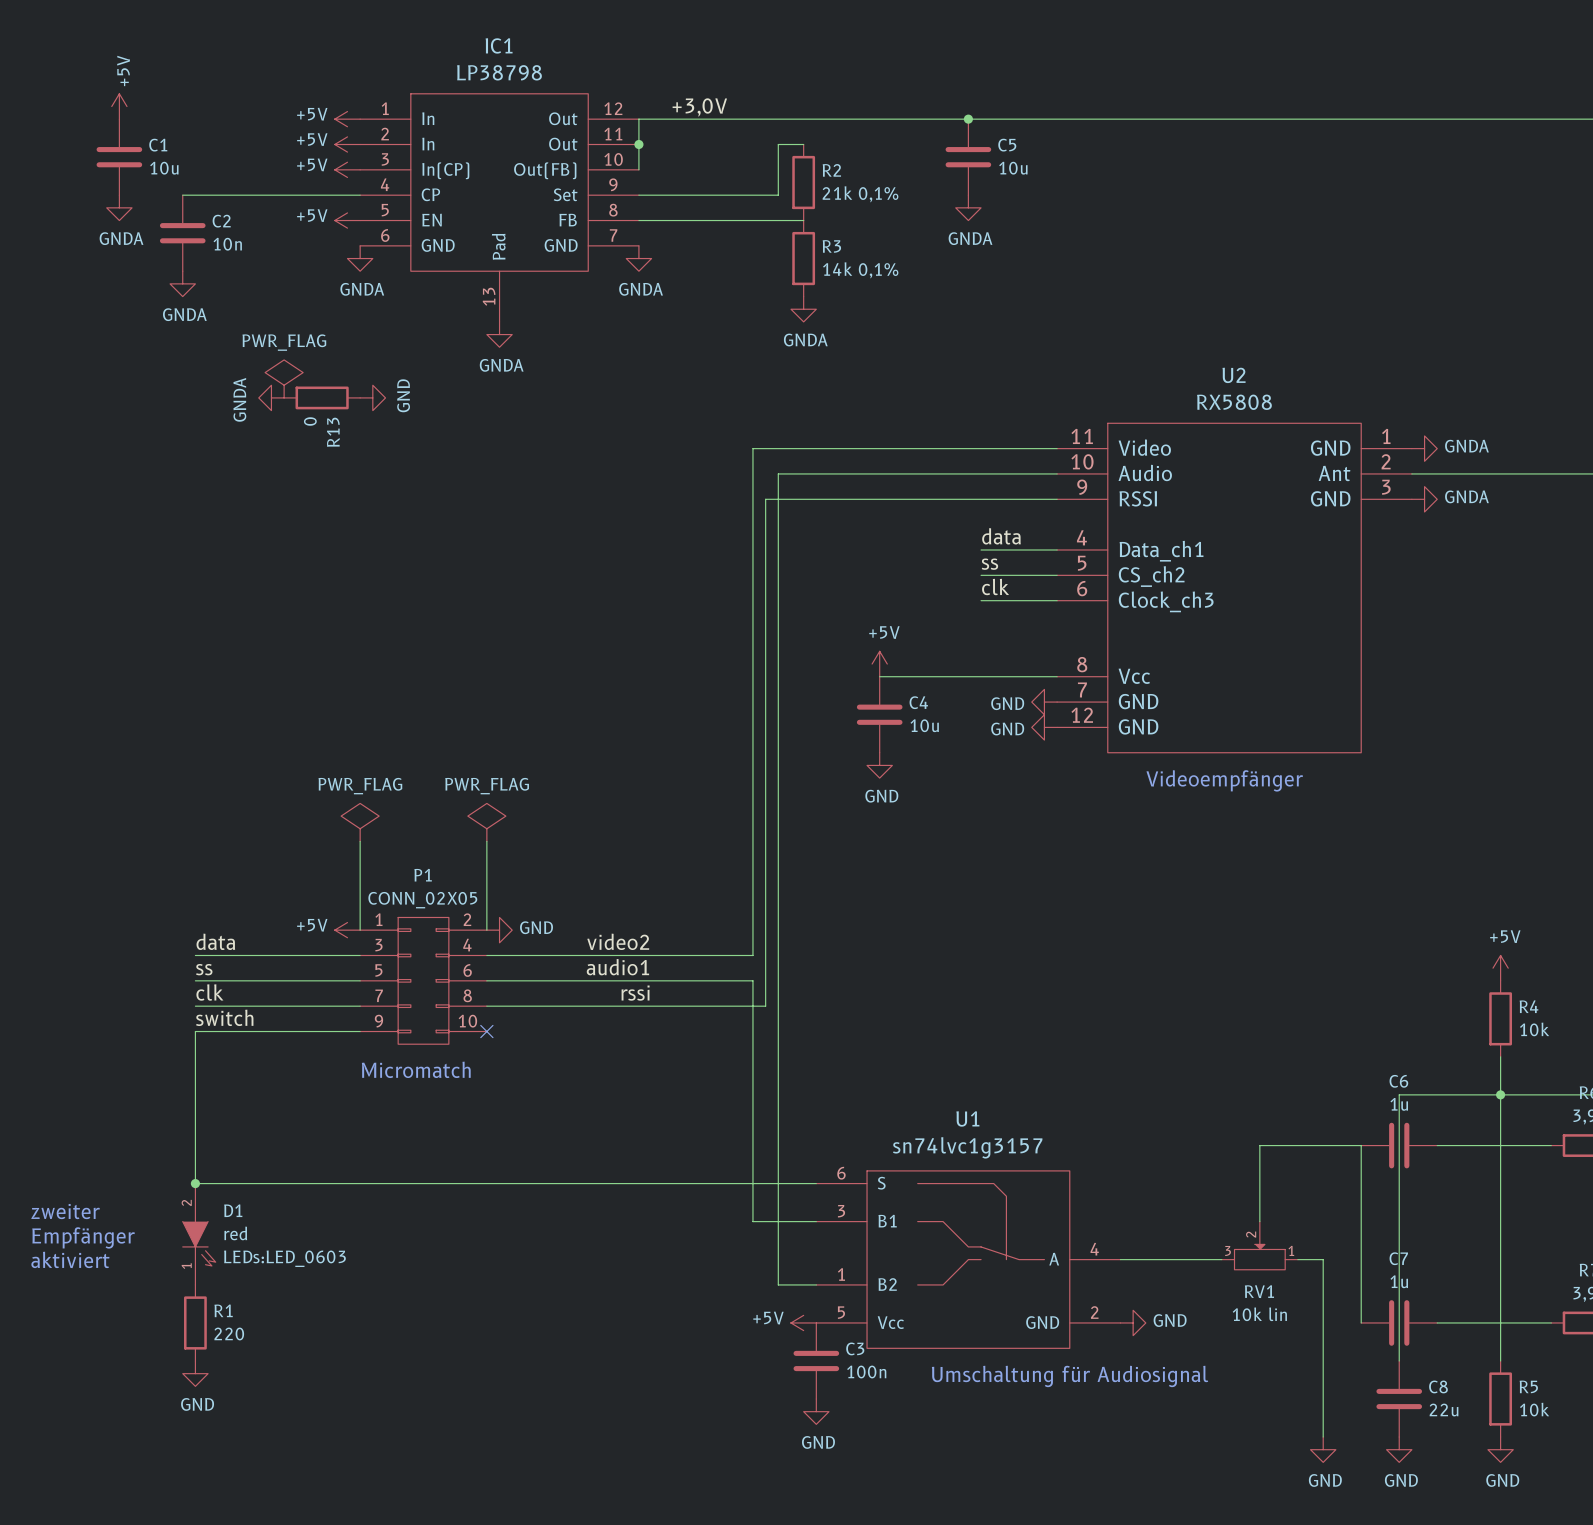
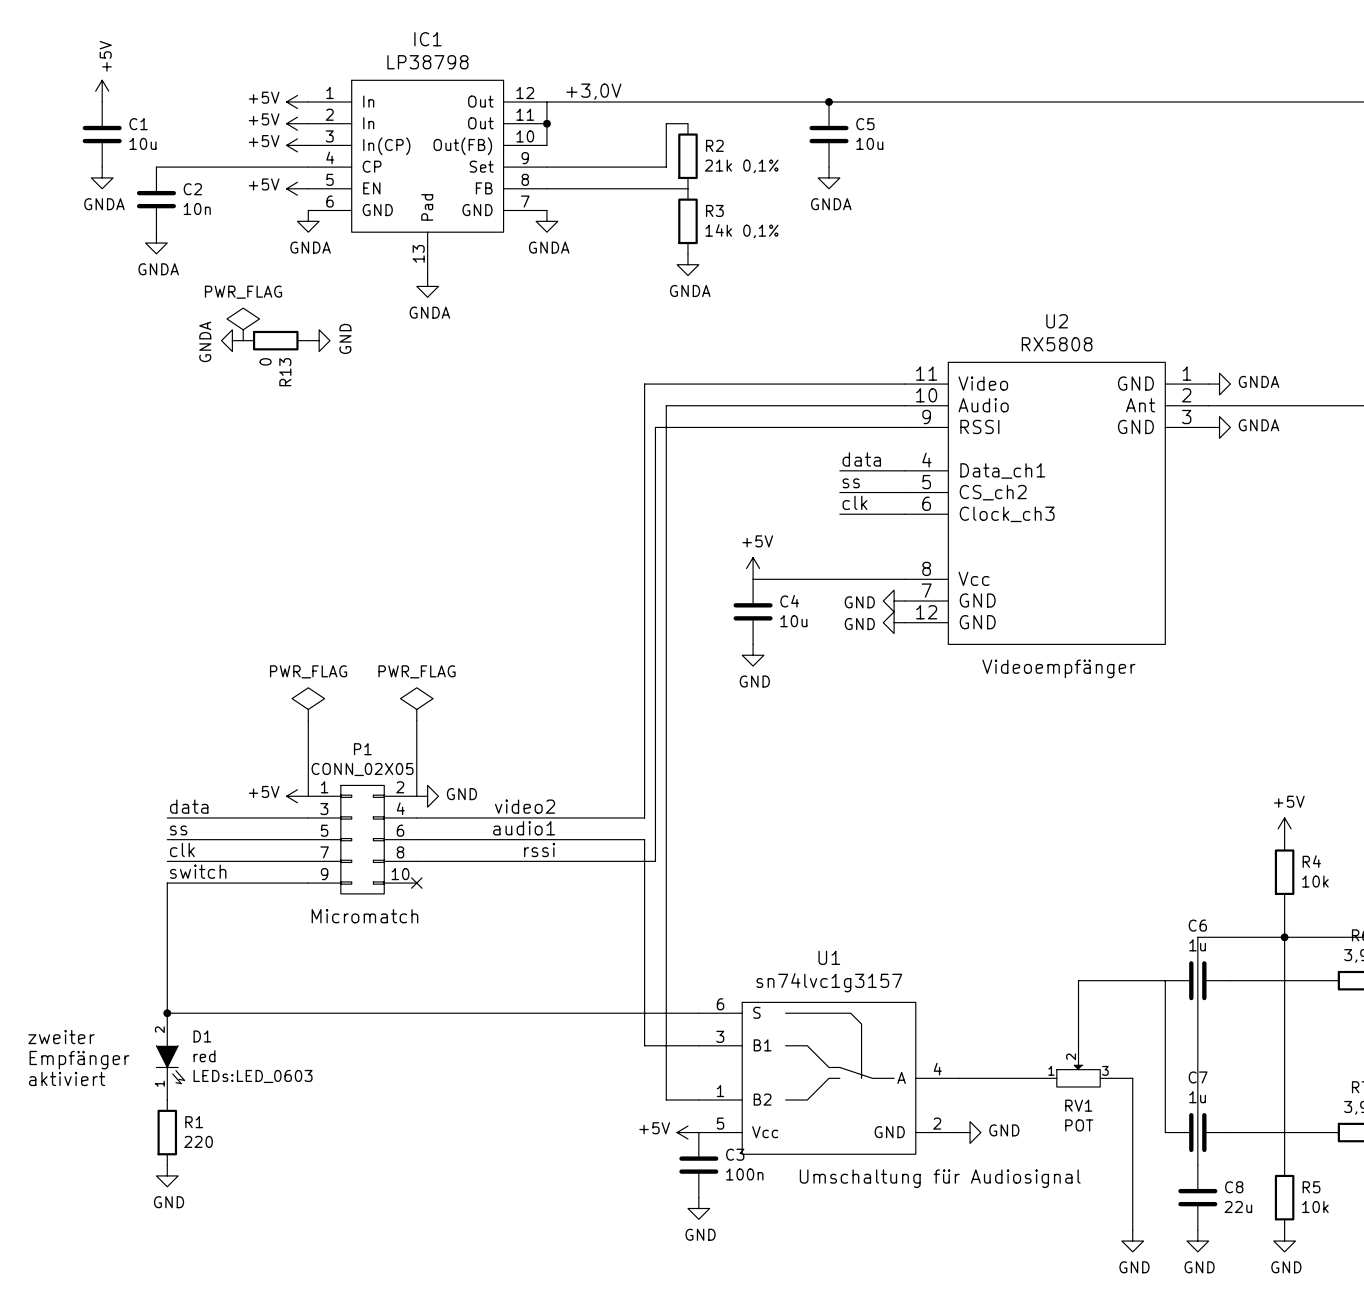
RV1 flip: as is (1259, 1257) -> left-right (1078, 1076)
RV1 value: 10k lin (1259, 1314) -> POT (1079, 1125)

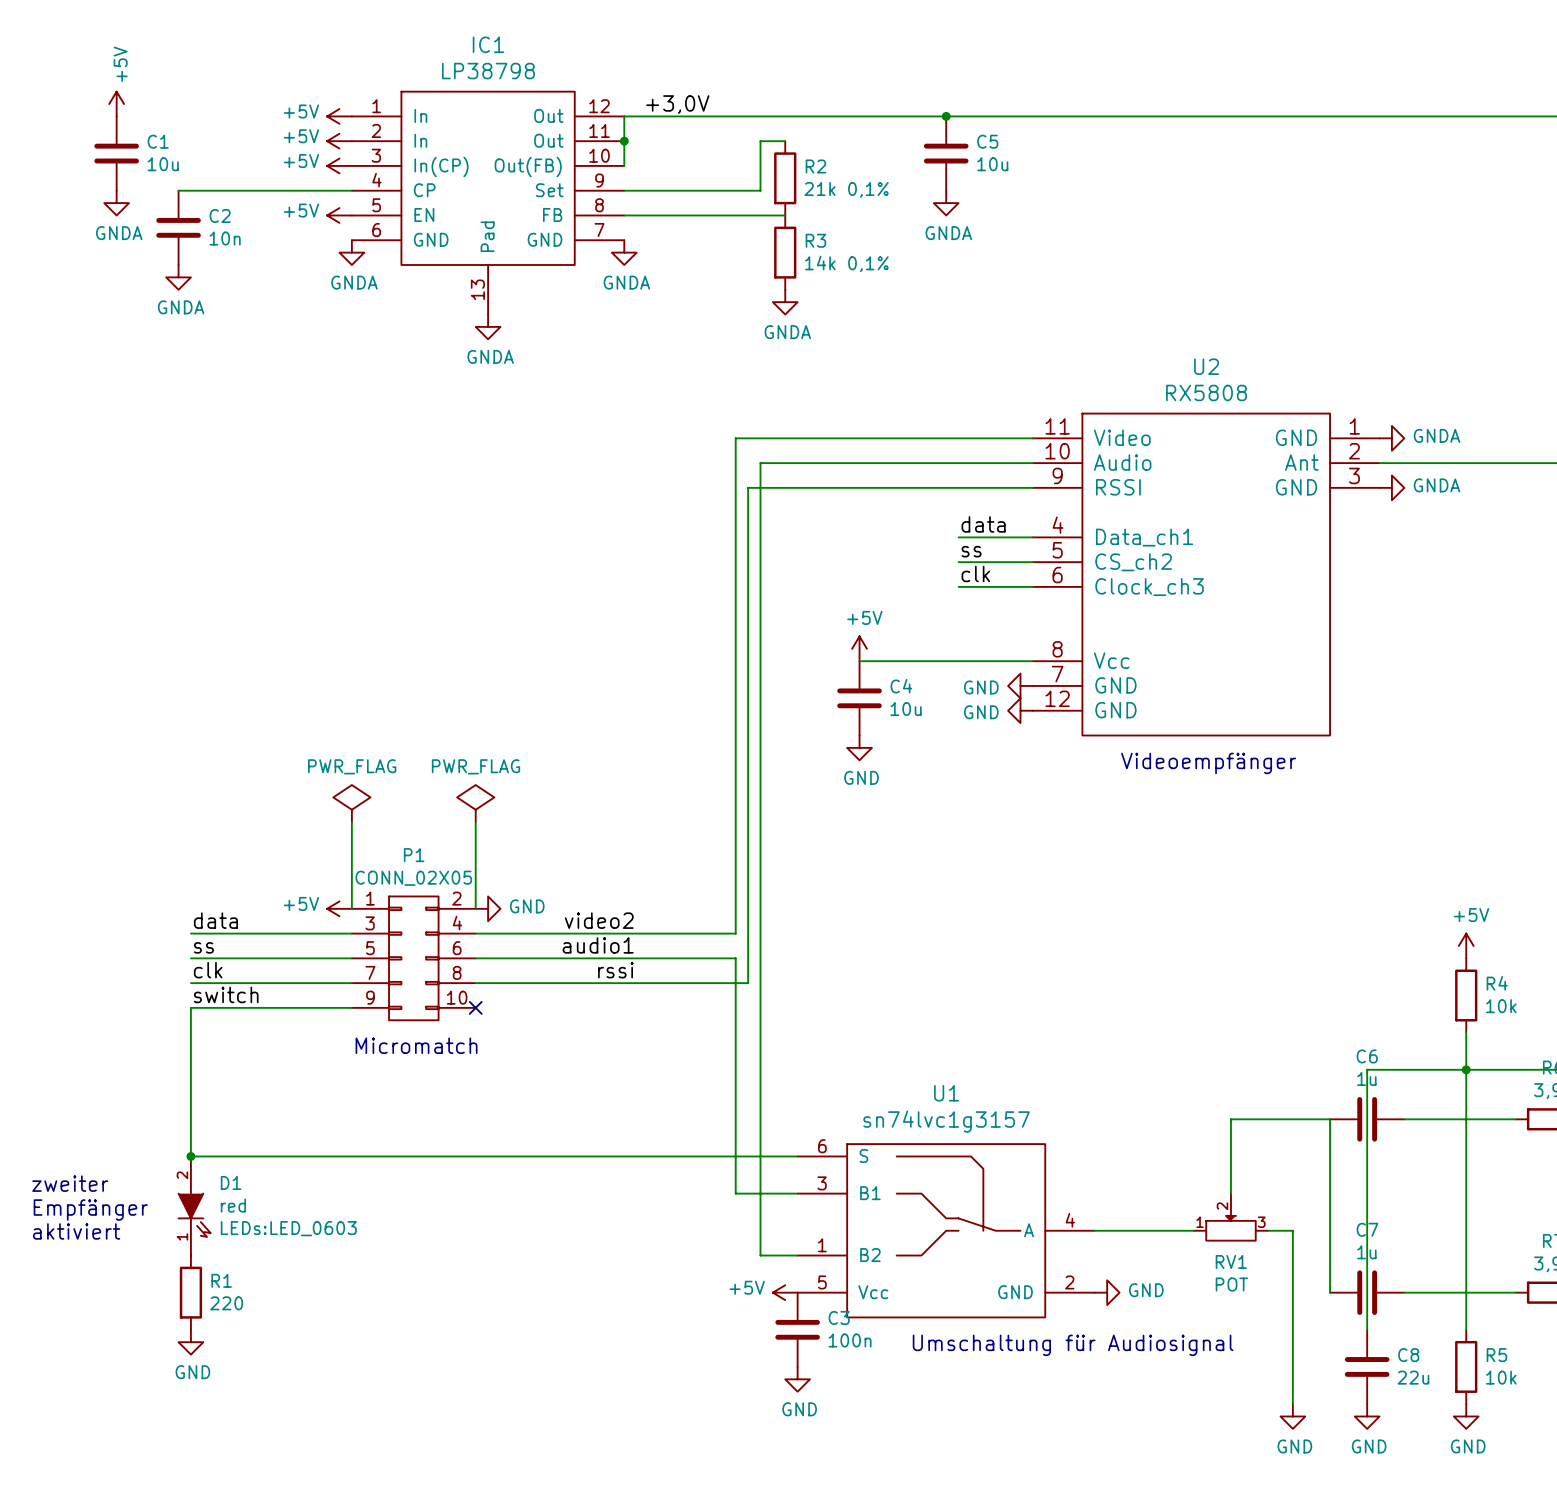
power symbol: PWR_FLAG (243, 324) -> none
power symbol: GNDA (232, 340) -> none
R13: 0 (275, 340) -> none
power symbol: GND (319, 340) -> none

